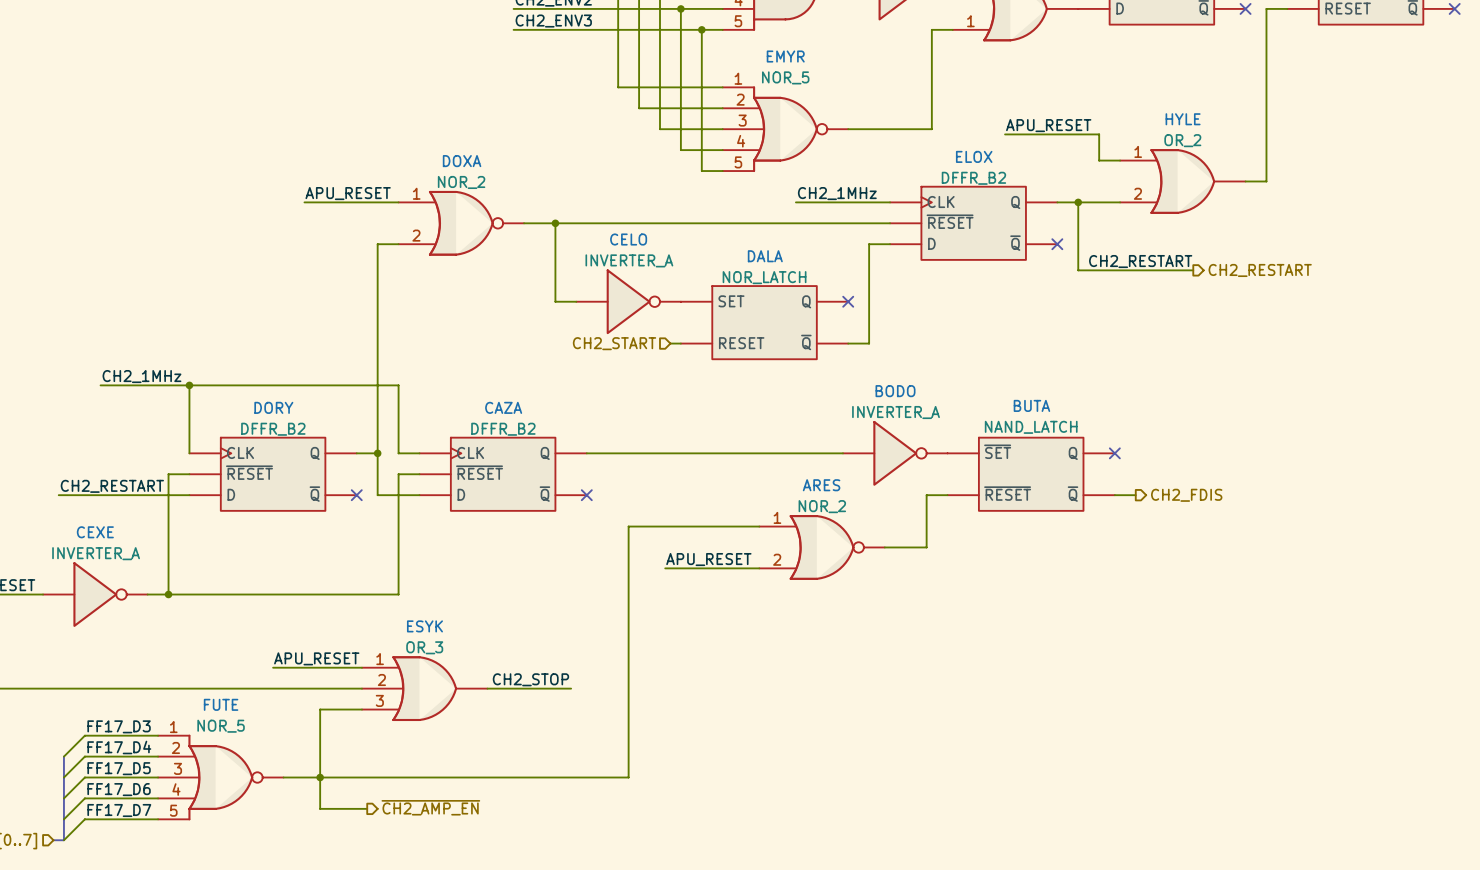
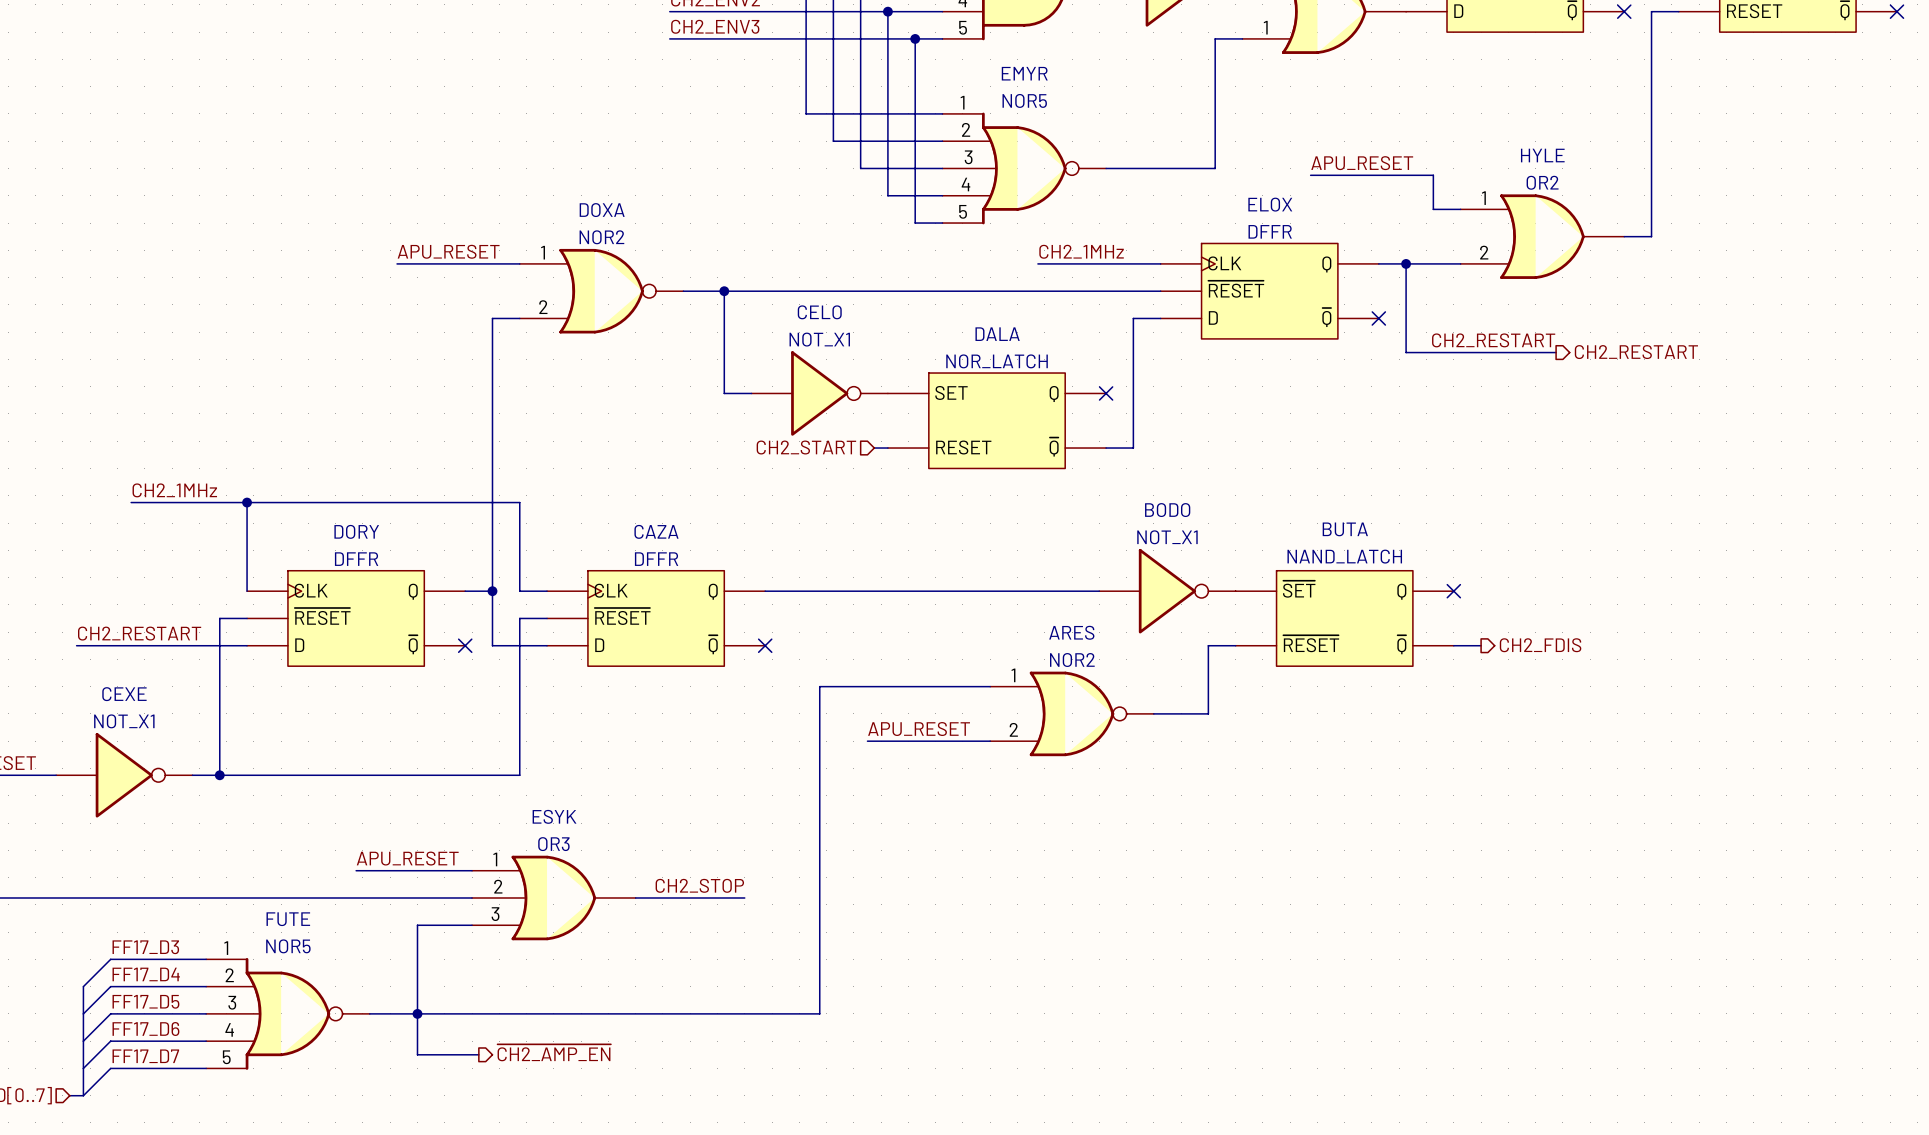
EMYR value: NOR_5 (785, 77) -> NOR5 (1024, 100)
HYLE value: OR_2 (1182, 140) -> OR2 (1542, 182)
ELOX value: DFFR_B2 (973, 178) -> DFFR (1270, 231)
DOXA value: NOR_2 (461, 182) -> NOR2 (601, 237)
CELO value: INVERTER_A (629, 260) -> NOT_X1 (819, 339)
BODO value: INVERTER_A (896, 412) -> NOT_X1 (1167, 537)
DORY value: DFFR_B2 (273, 429) -> DFFR (356, 559)
CAZA value: DFFR_B2 (503, 429) -> DFFR (656, 559)
ARES value: NOR_2 (822, 506) -> NOR2 (1072, 660)
CEXE value: INVERTER_A (96, 553) -> NOT_X1 (124, 721)
ESYK value: OR_3 (424, 647) -> OR3 (553, 844)
FUTE value: NOR_5 (221, 726) -> NOR5 (288, 946)

